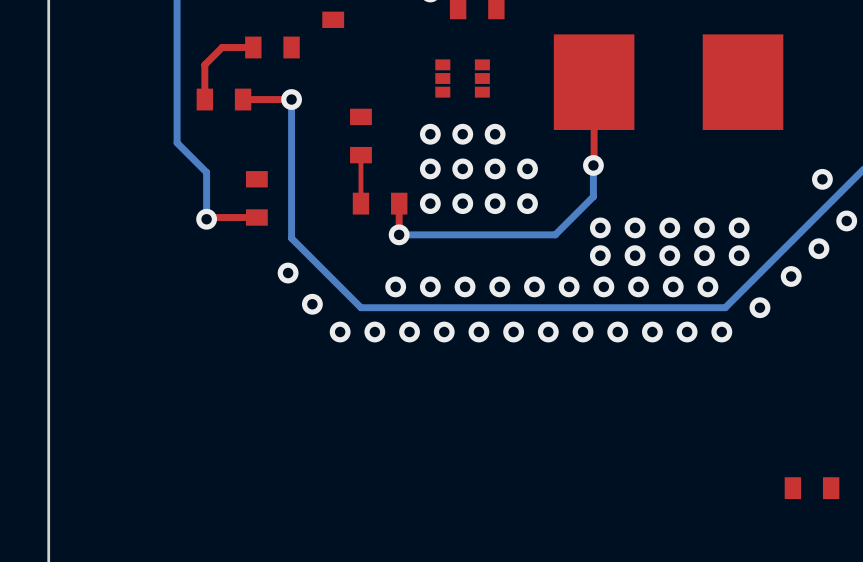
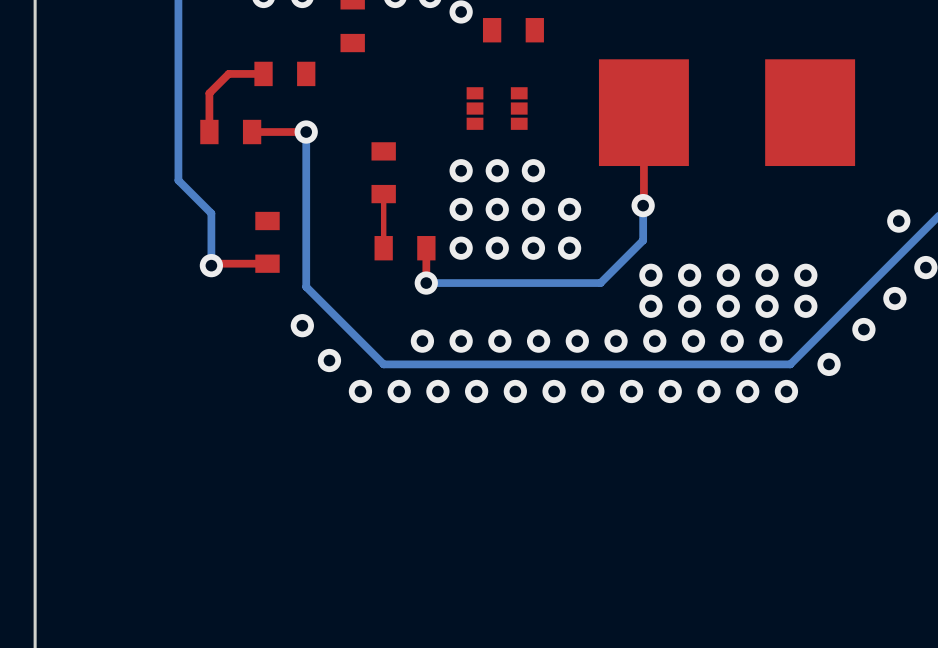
part: (812, 488) -> none

